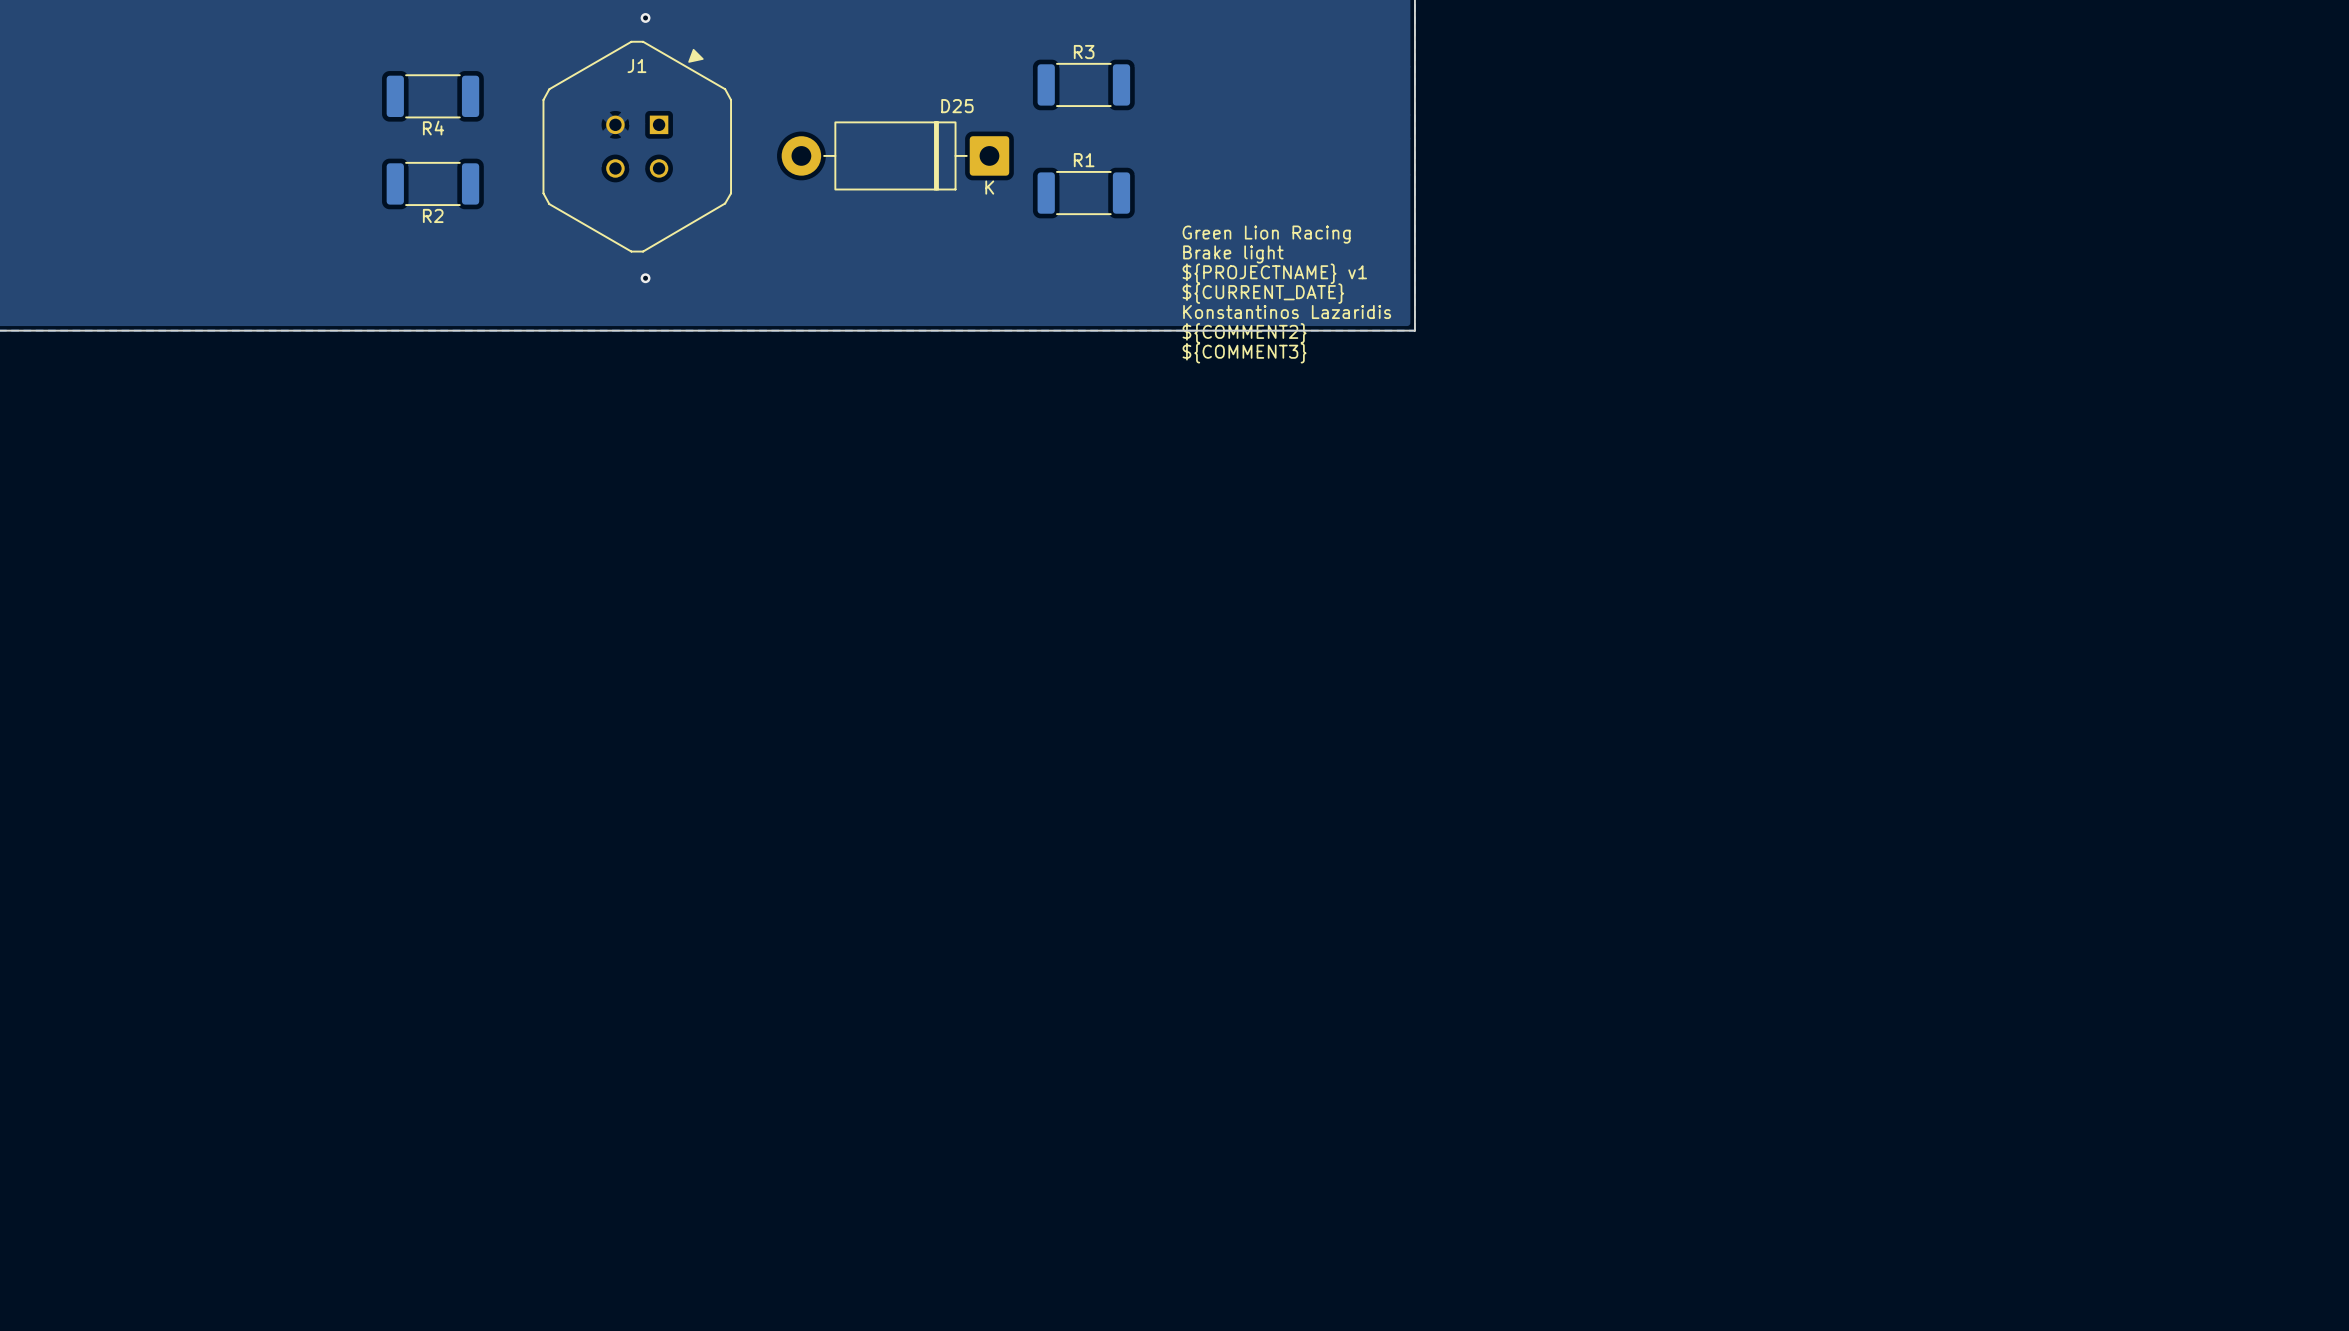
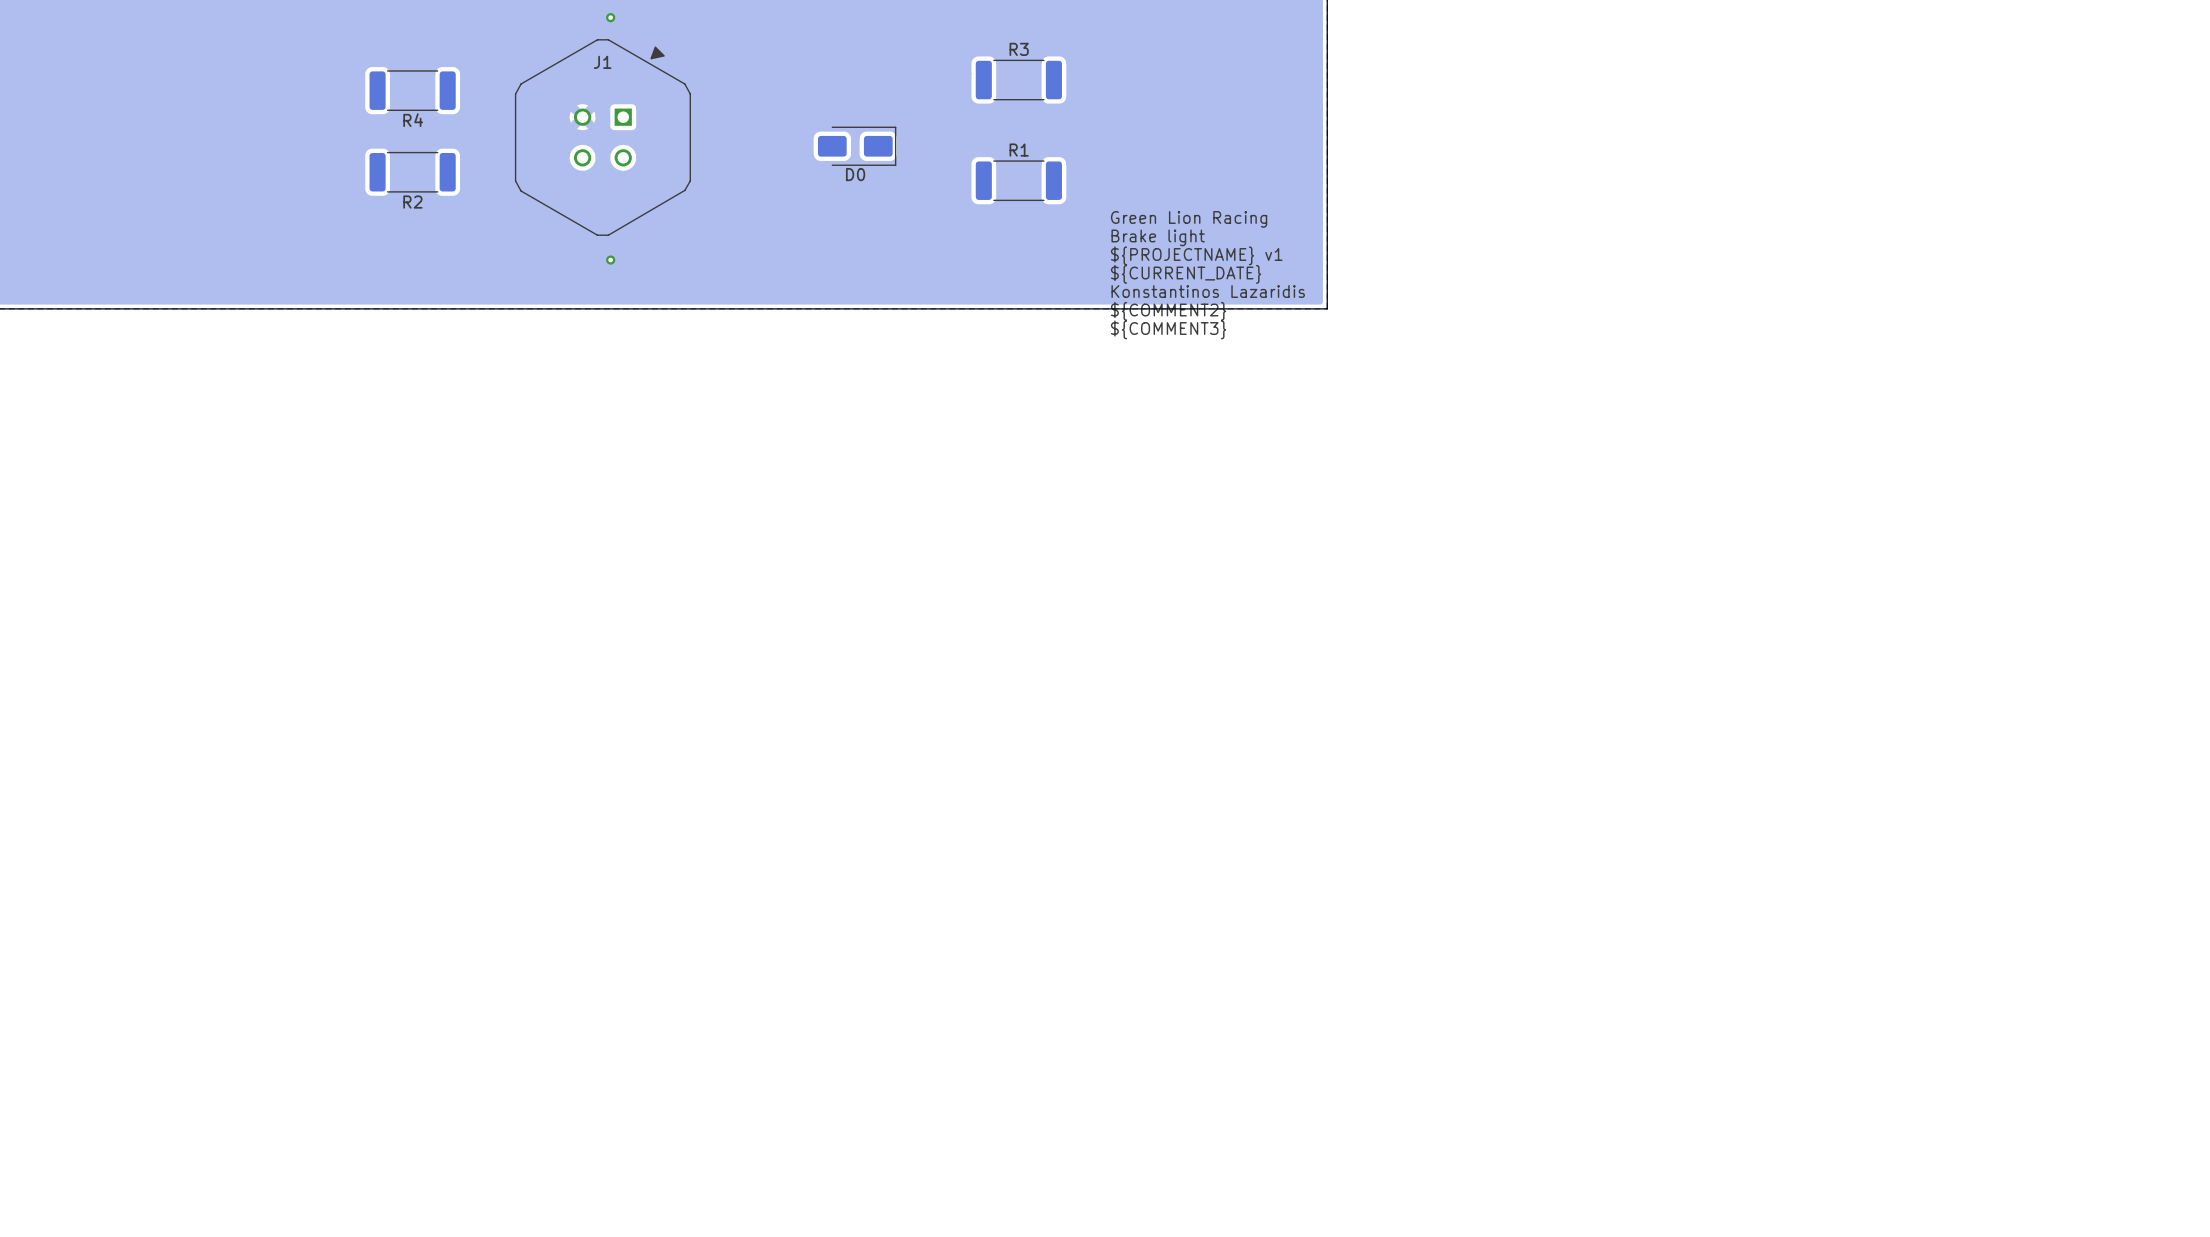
D25: (895, 155) -> none
D0: none -> (857, 146)

